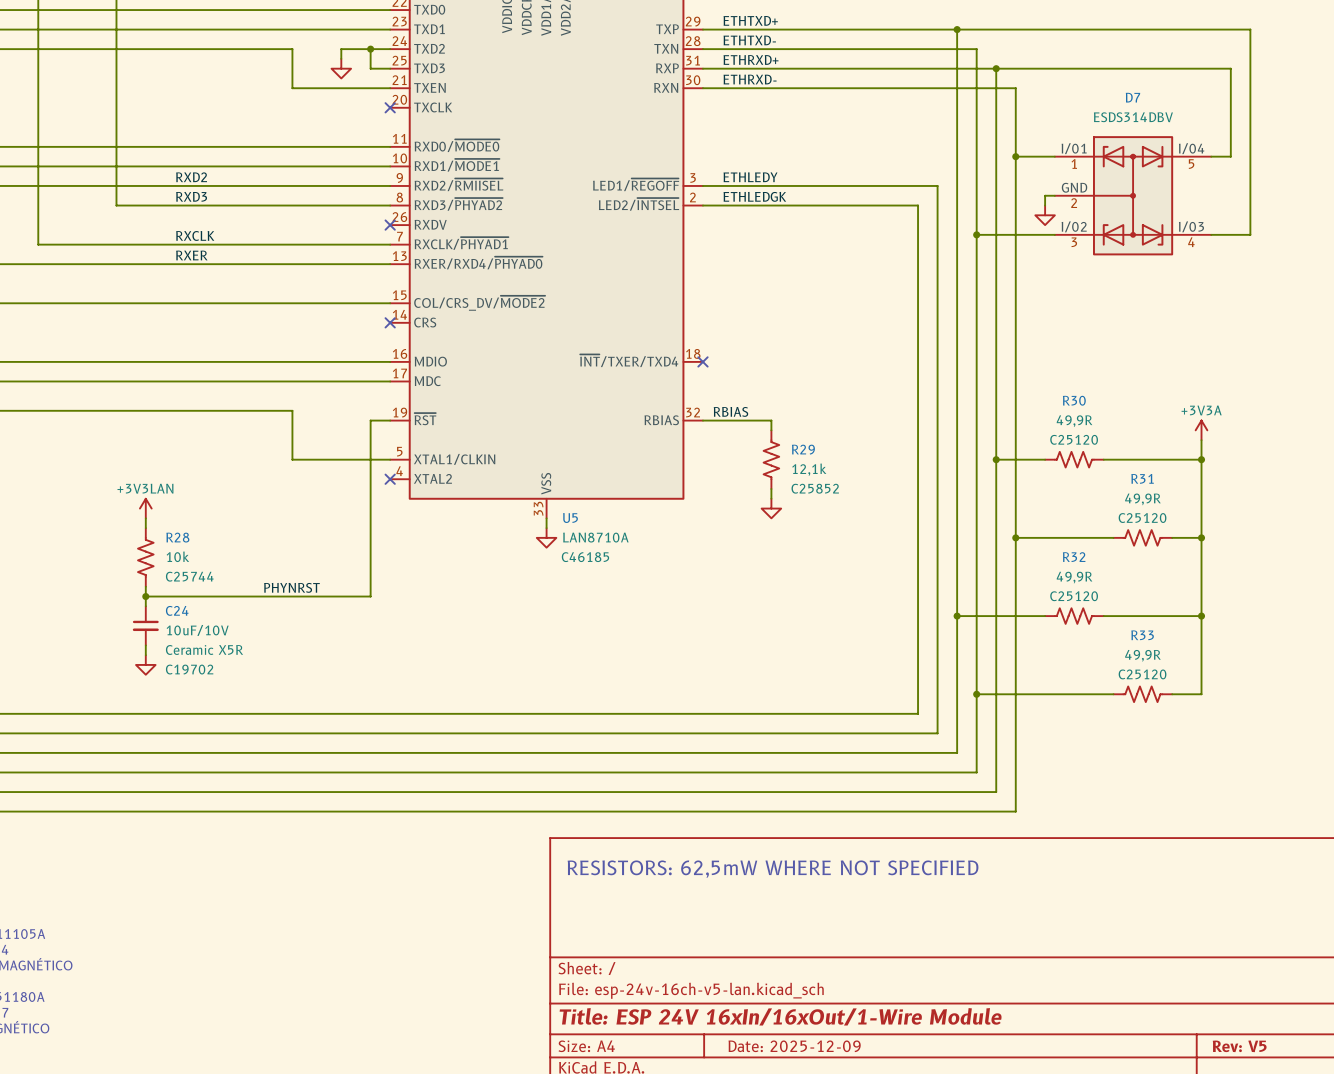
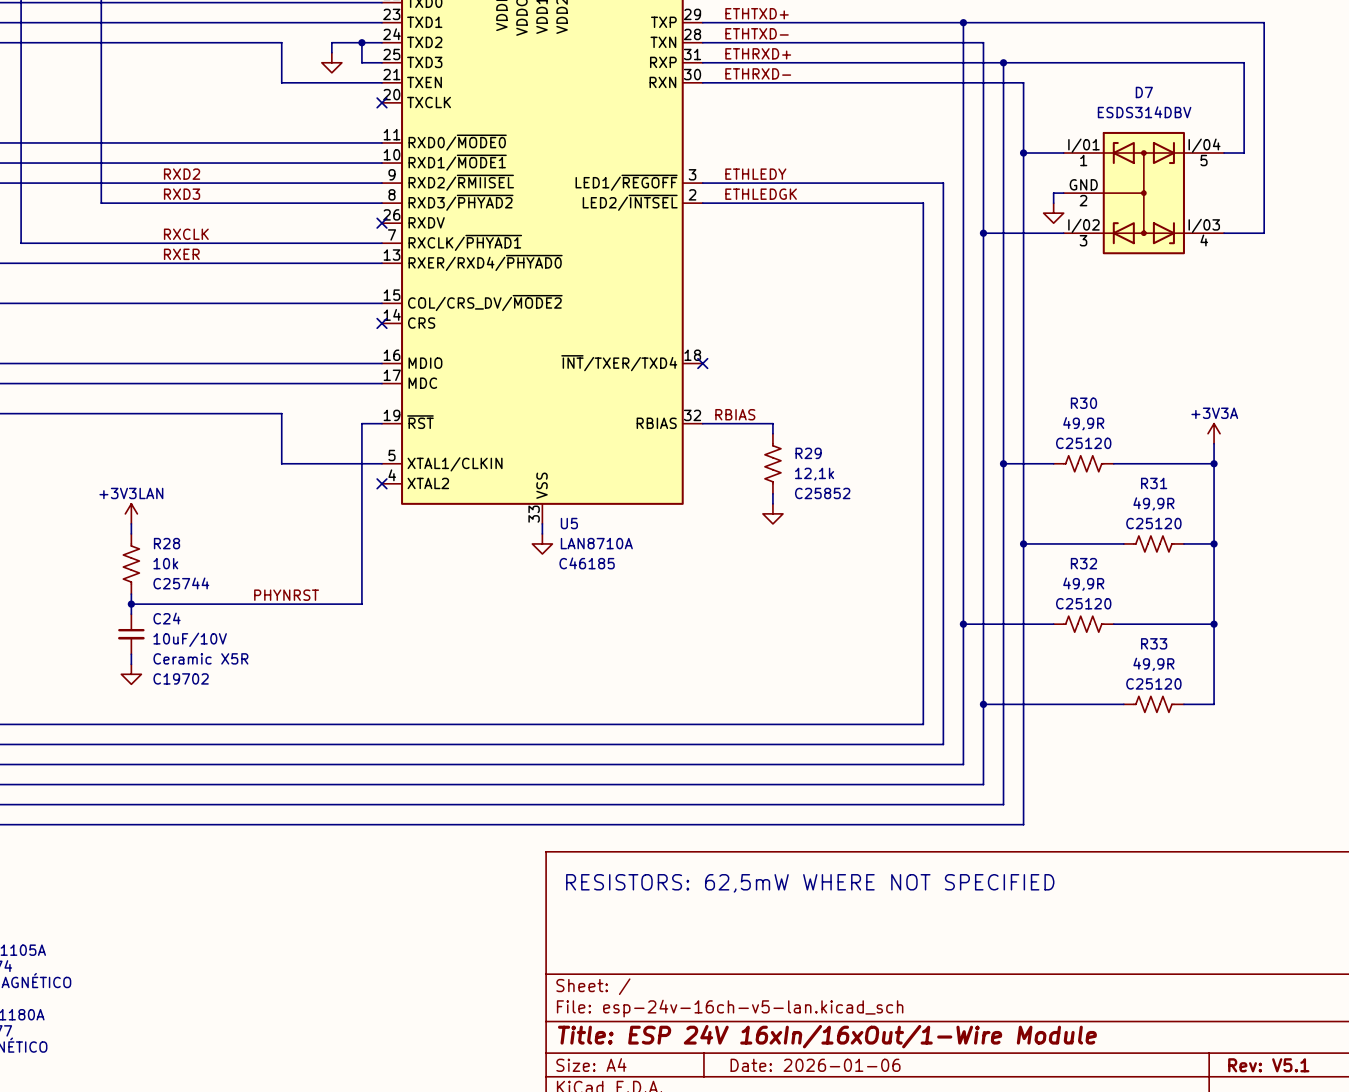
title block: Date: 2025-12-09 (794, 1046) -> Date: 2026-01-06 (815, 1065)
title block: Rev: V5 (1239, 1046) -> Rev: V5.1 (1268, 1065)

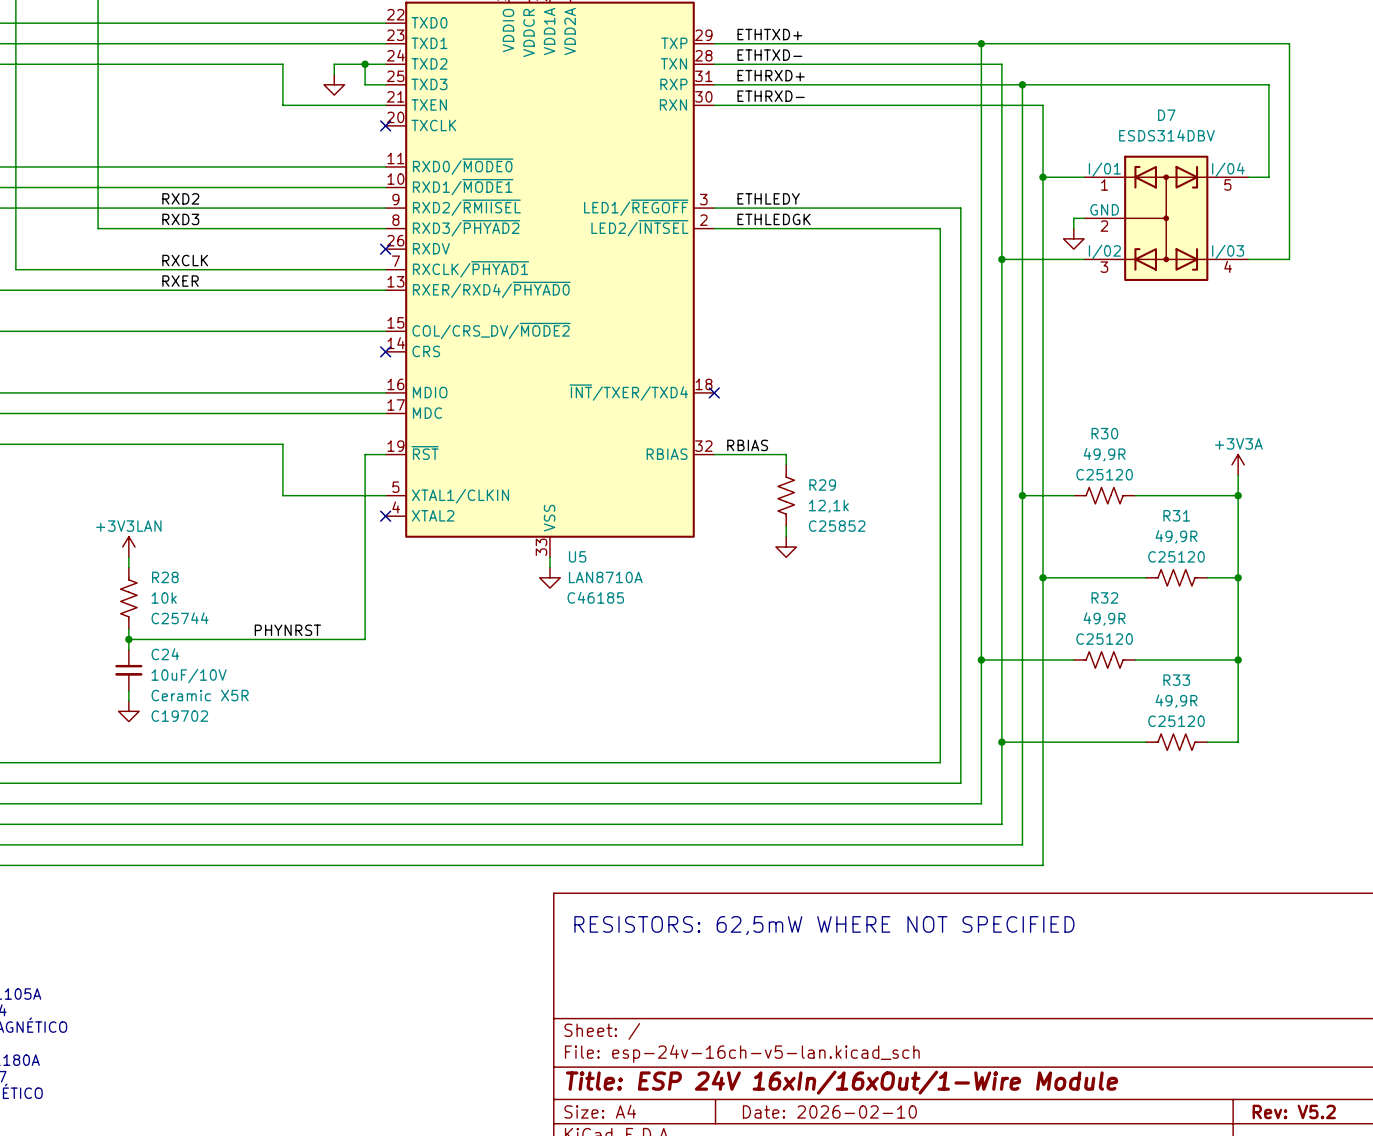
title block: Date: 2026-01-06 (815, 1065) -> Date: 2026-02-10 (829, 1111)
title block: Rev: V5.1 (1268, 1065) -> Rev: V5.2 (1294, 1111)

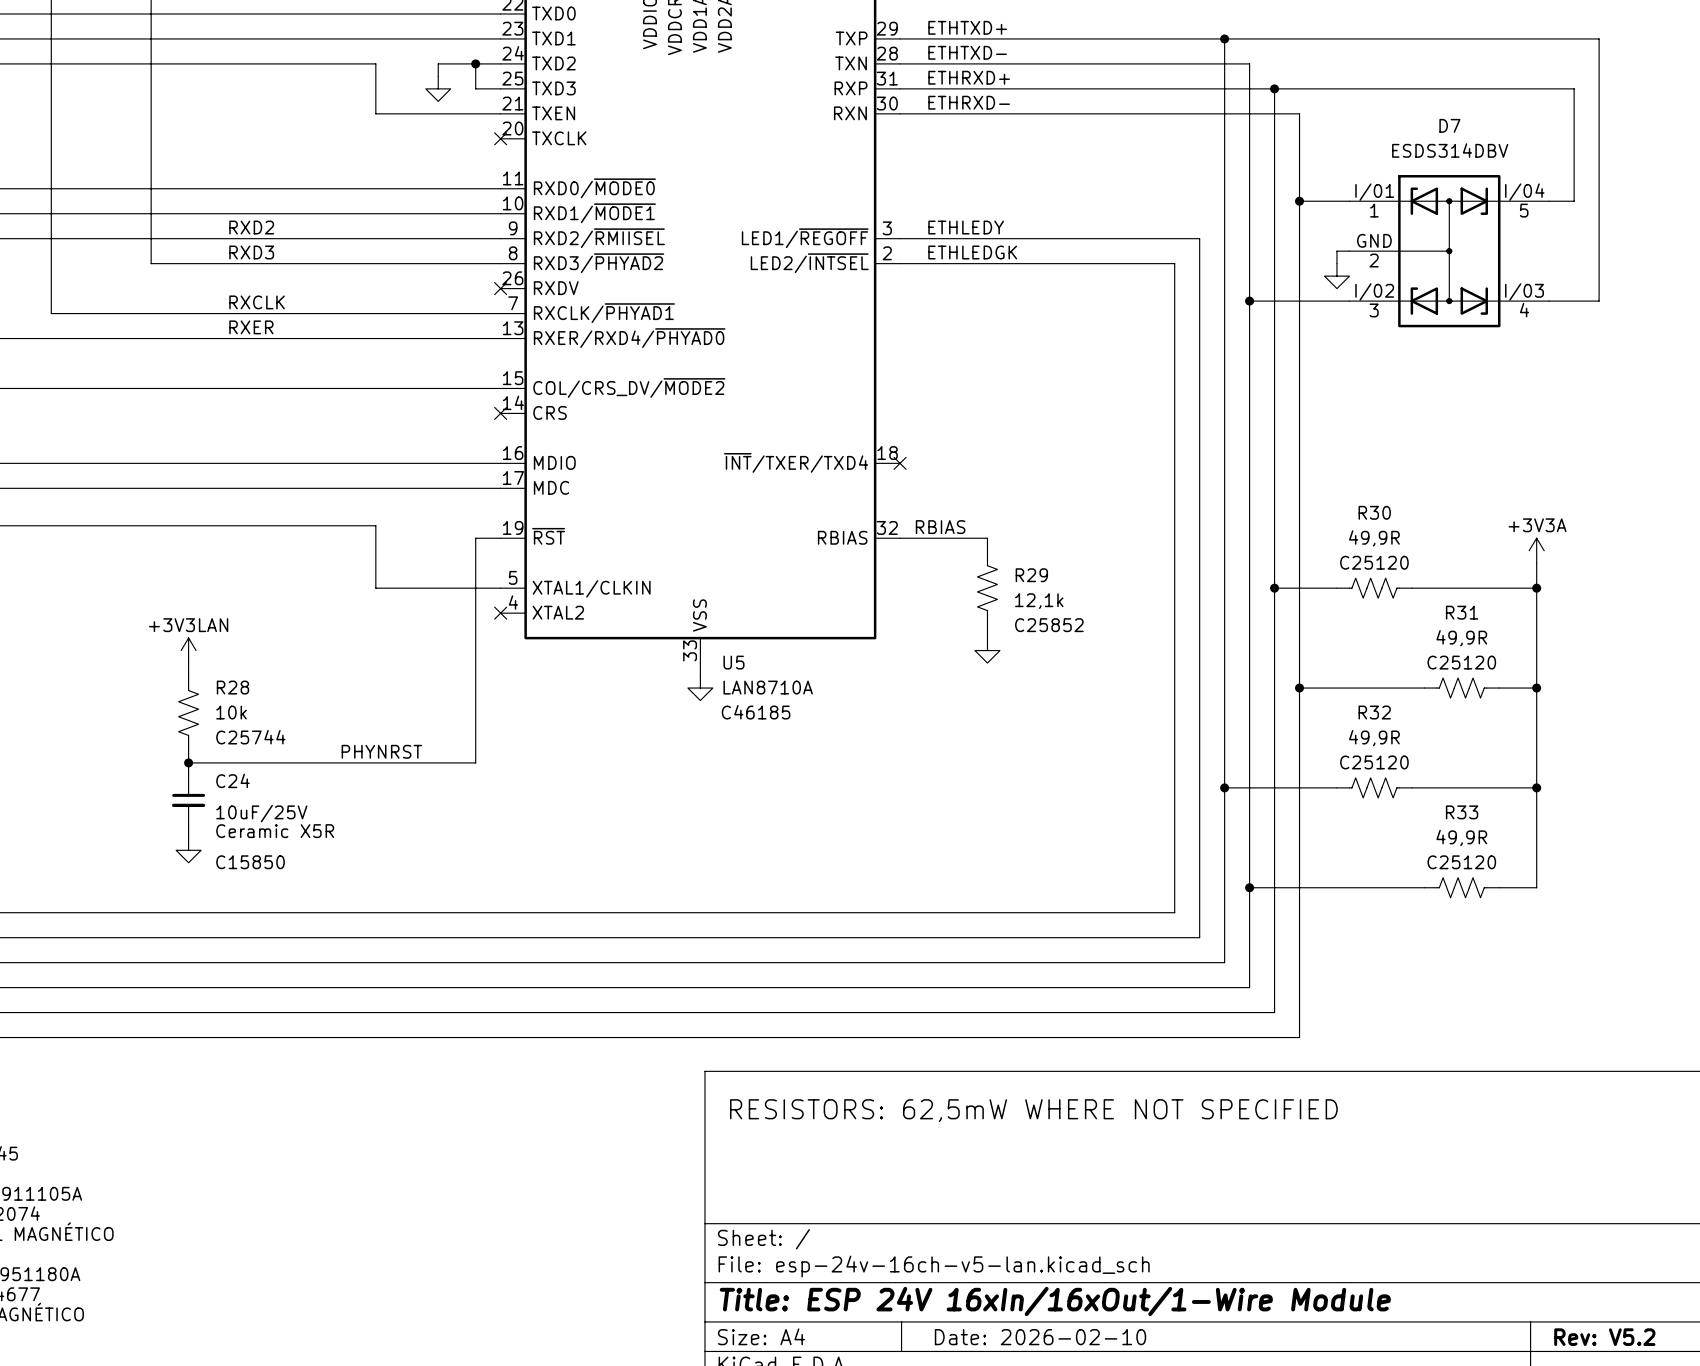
C24 value: 10uF/10V (189, 675) -> 10uF/25V (261, 813)
C24 text: C19702 (179, 716) -> C15850 (250, 862)

